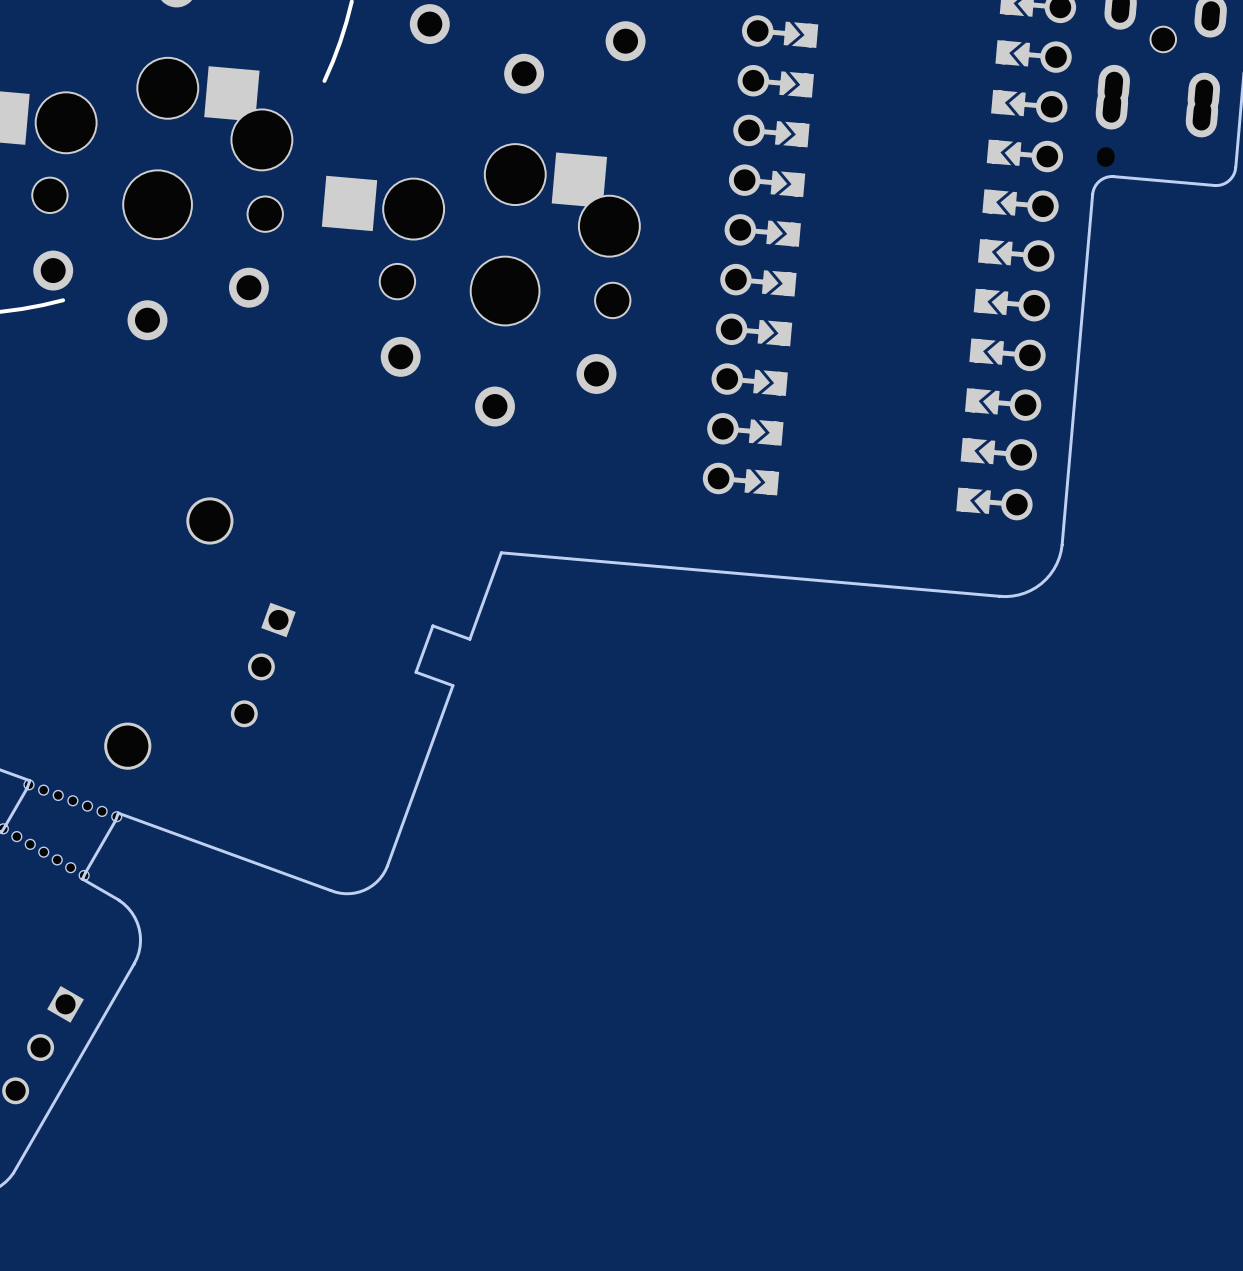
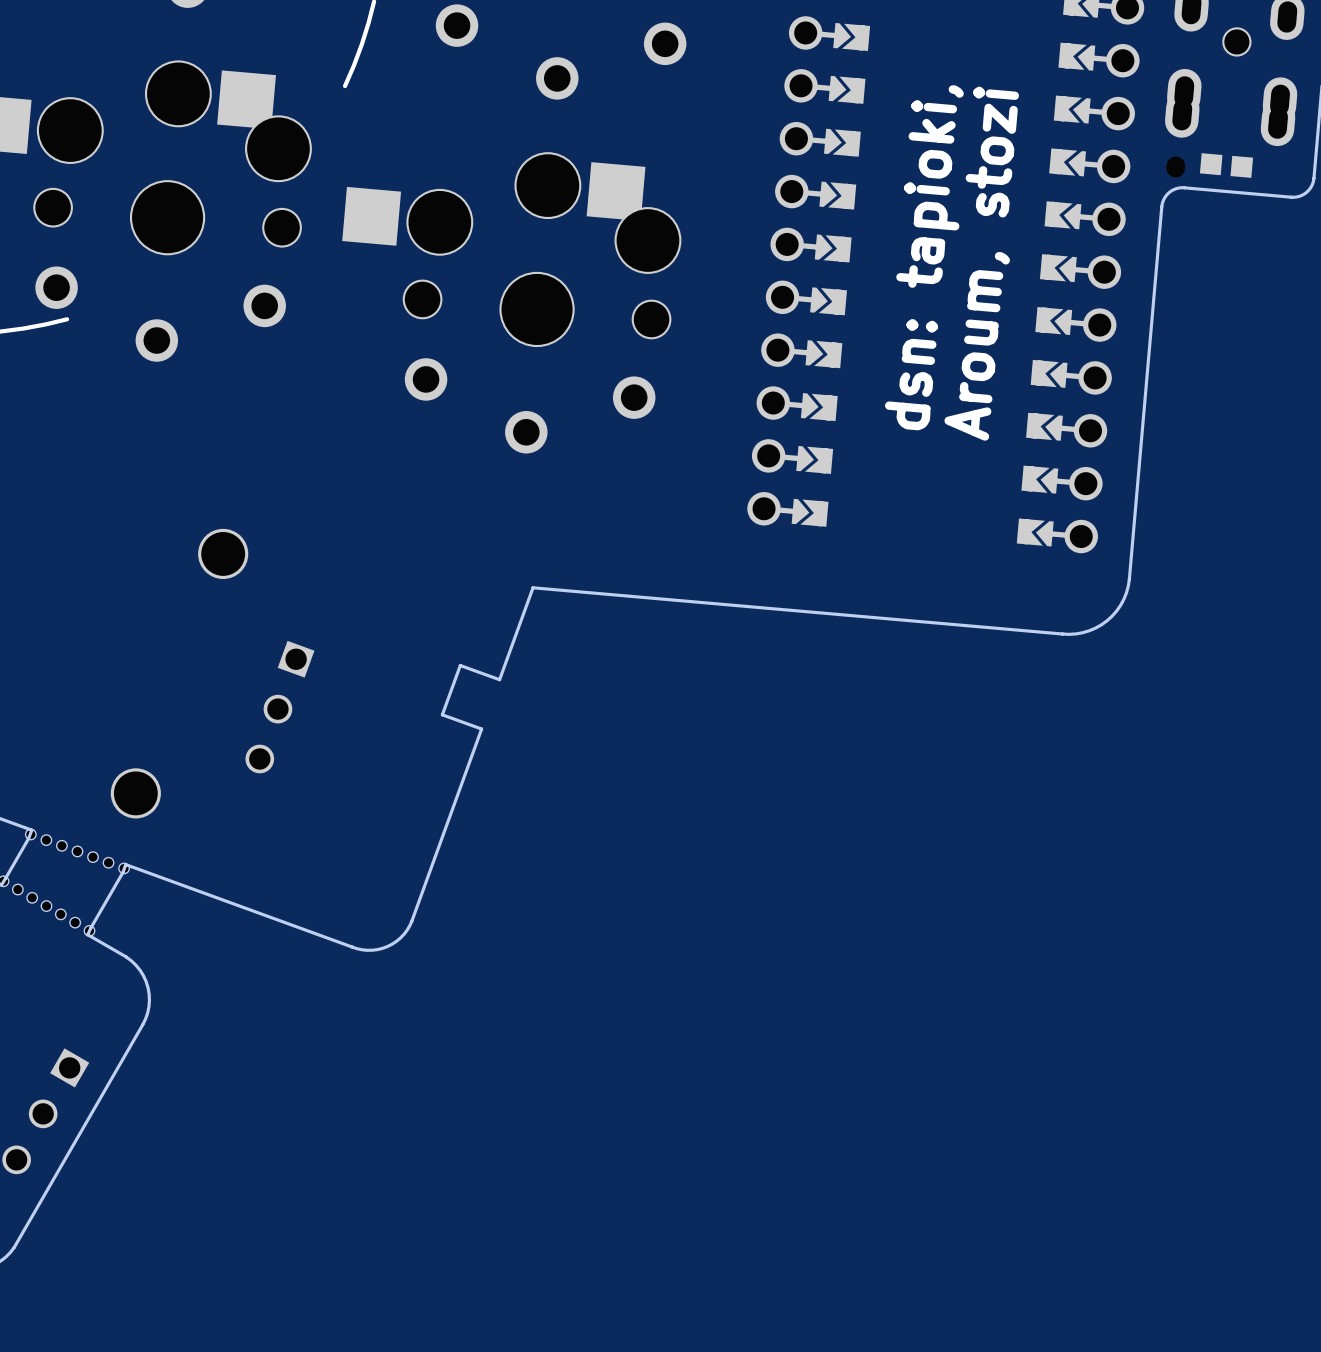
part: none -> (1226, 165)
text: none -> dsn: tapioki, (924, 257)
text: none -> Aroum, stozi (981, 263)

